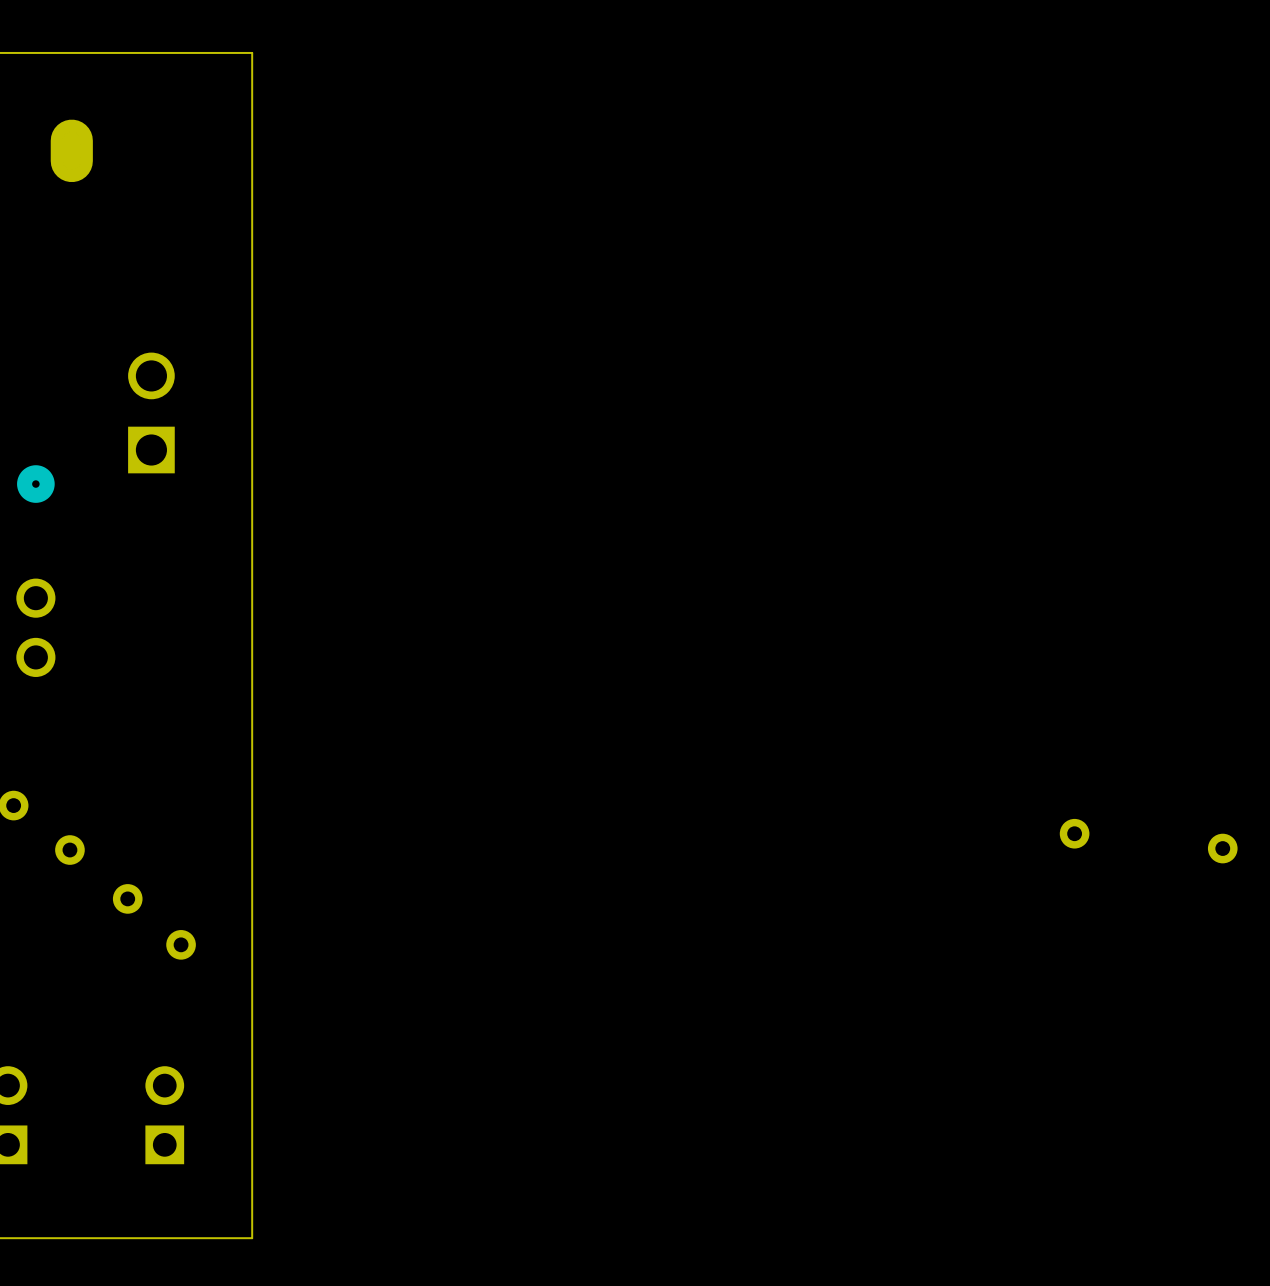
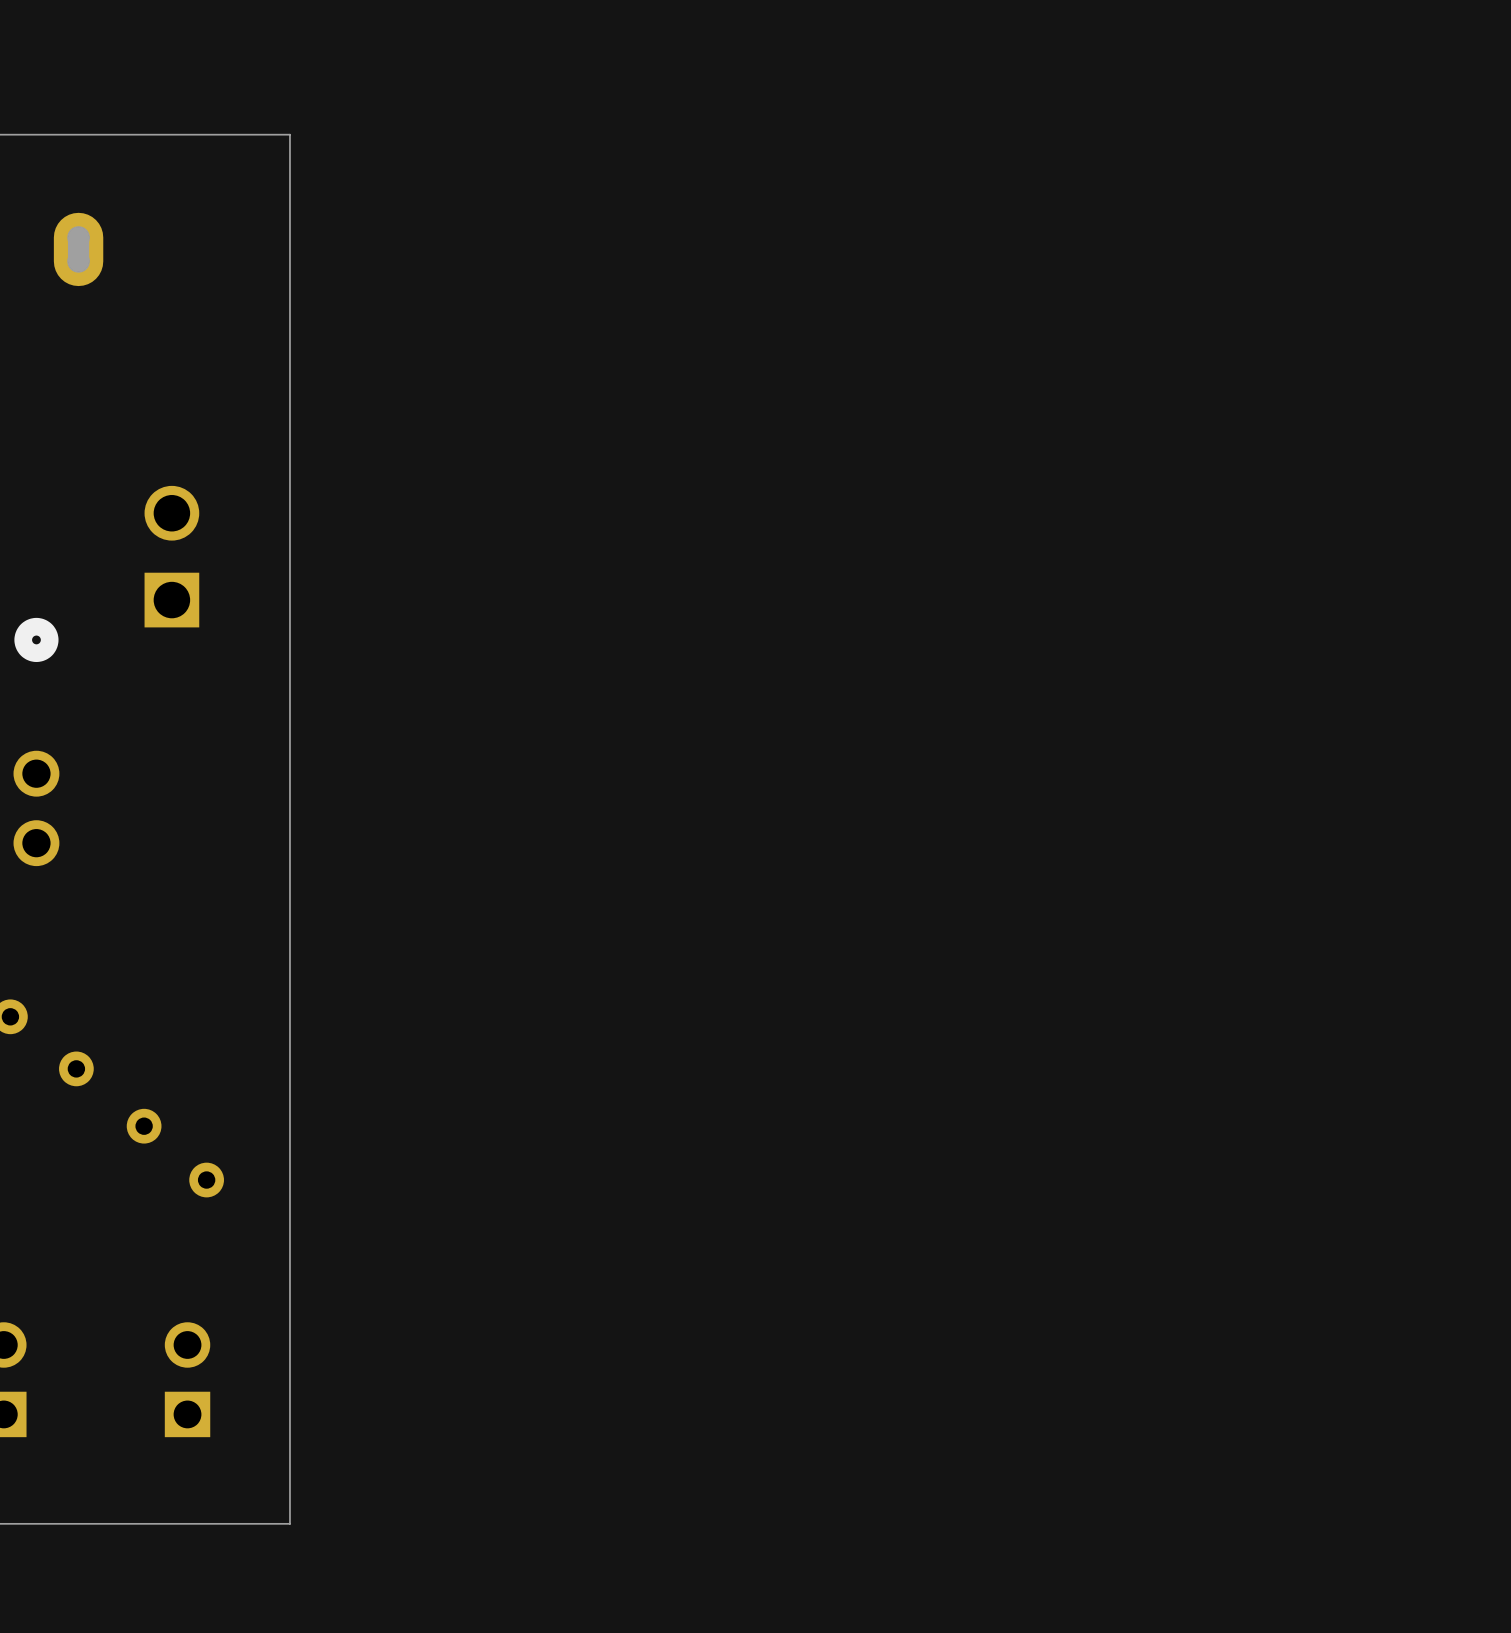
part: (1074, 833) -> none
part: (1222, 848) -> none

